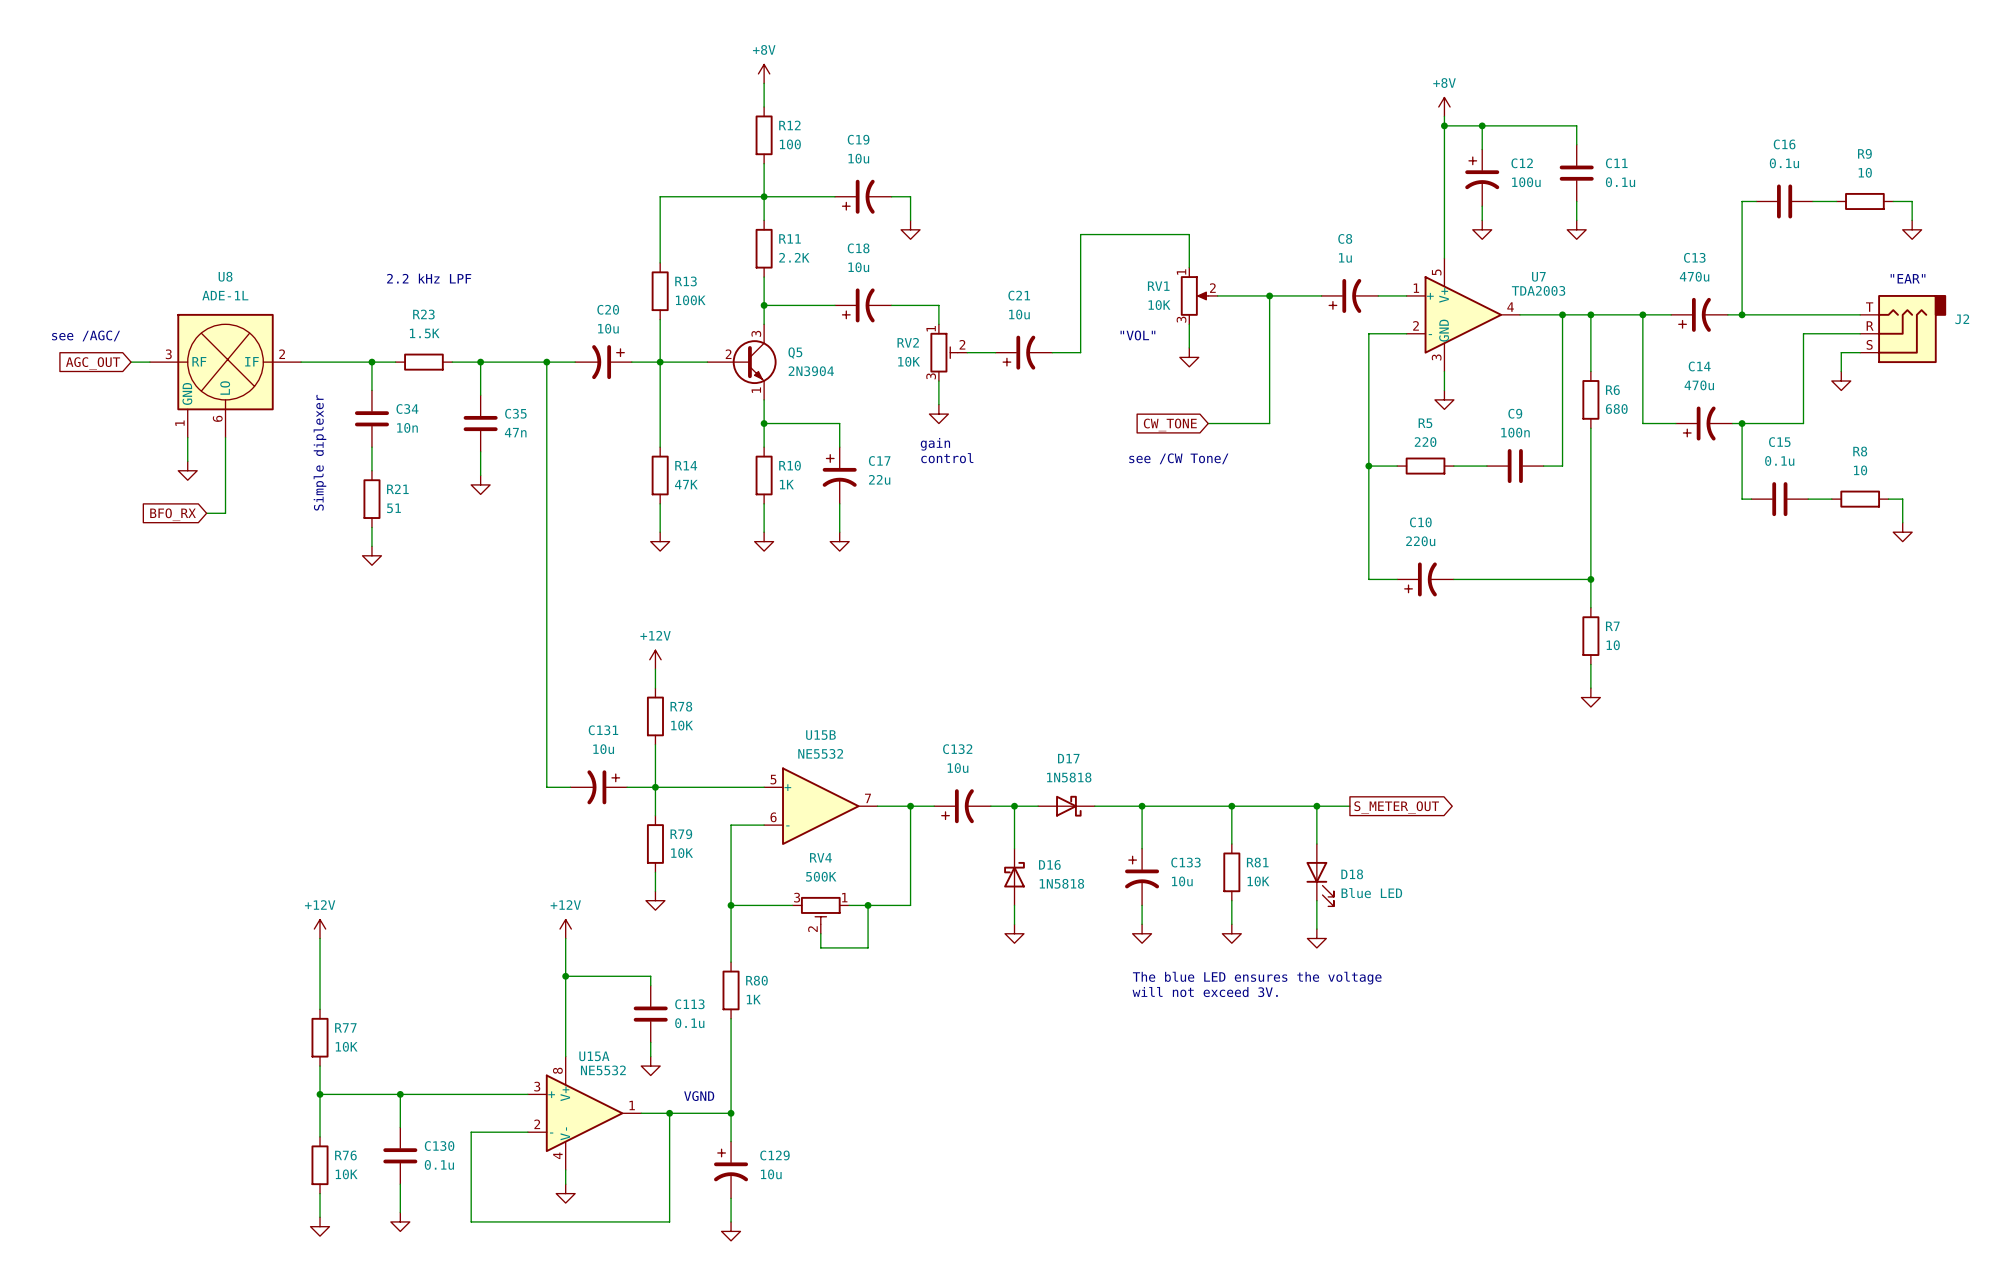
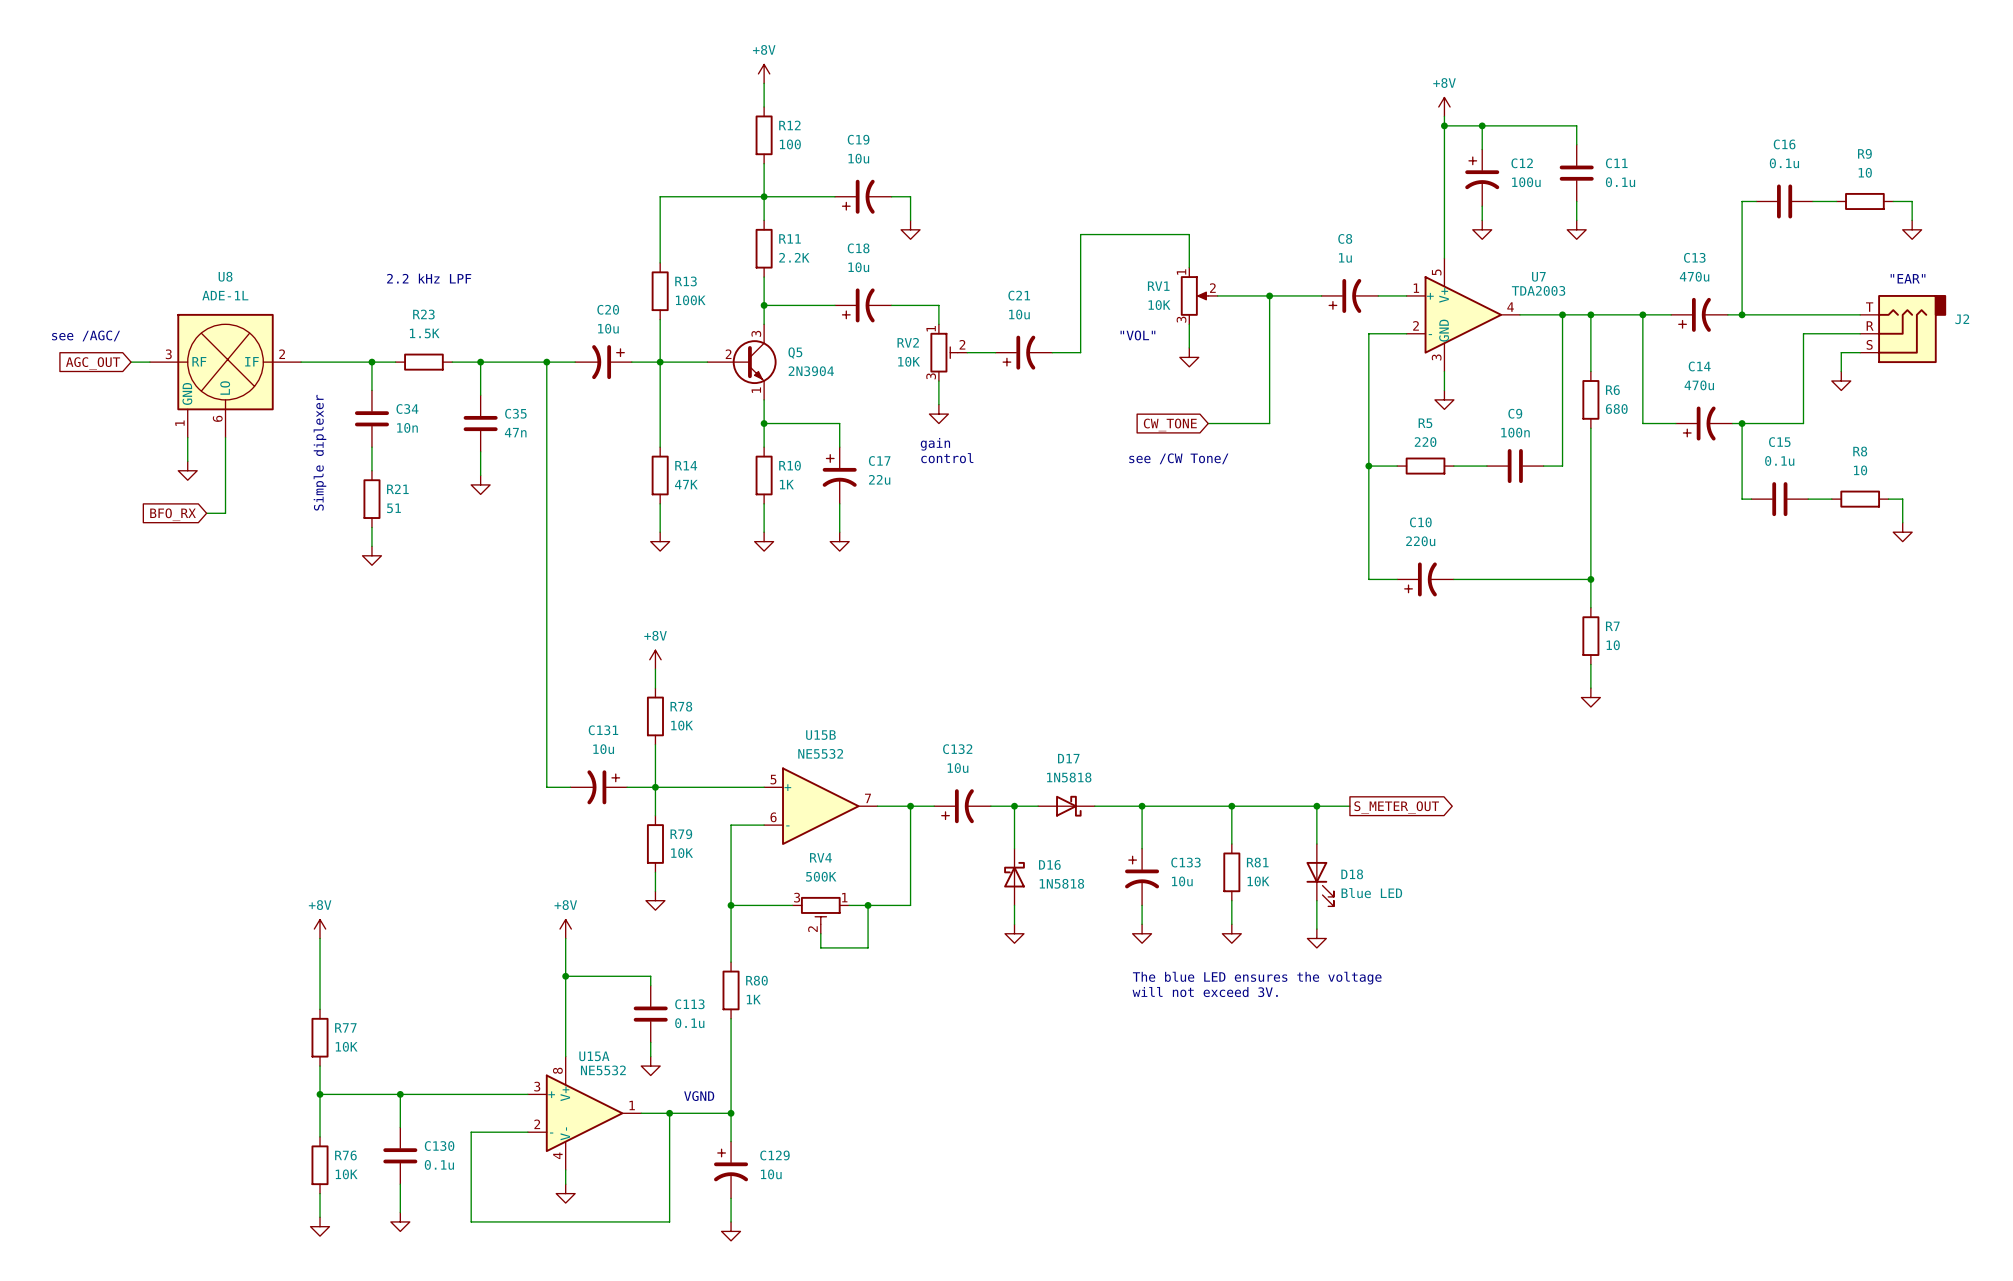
power symbol: +12V (655, 659) -> +8V (655, 659)
power symbol: +12V (320, 929) -> +8V (320, 929)
power symbol: +12V (565, 929) -> +8V (565, 929)

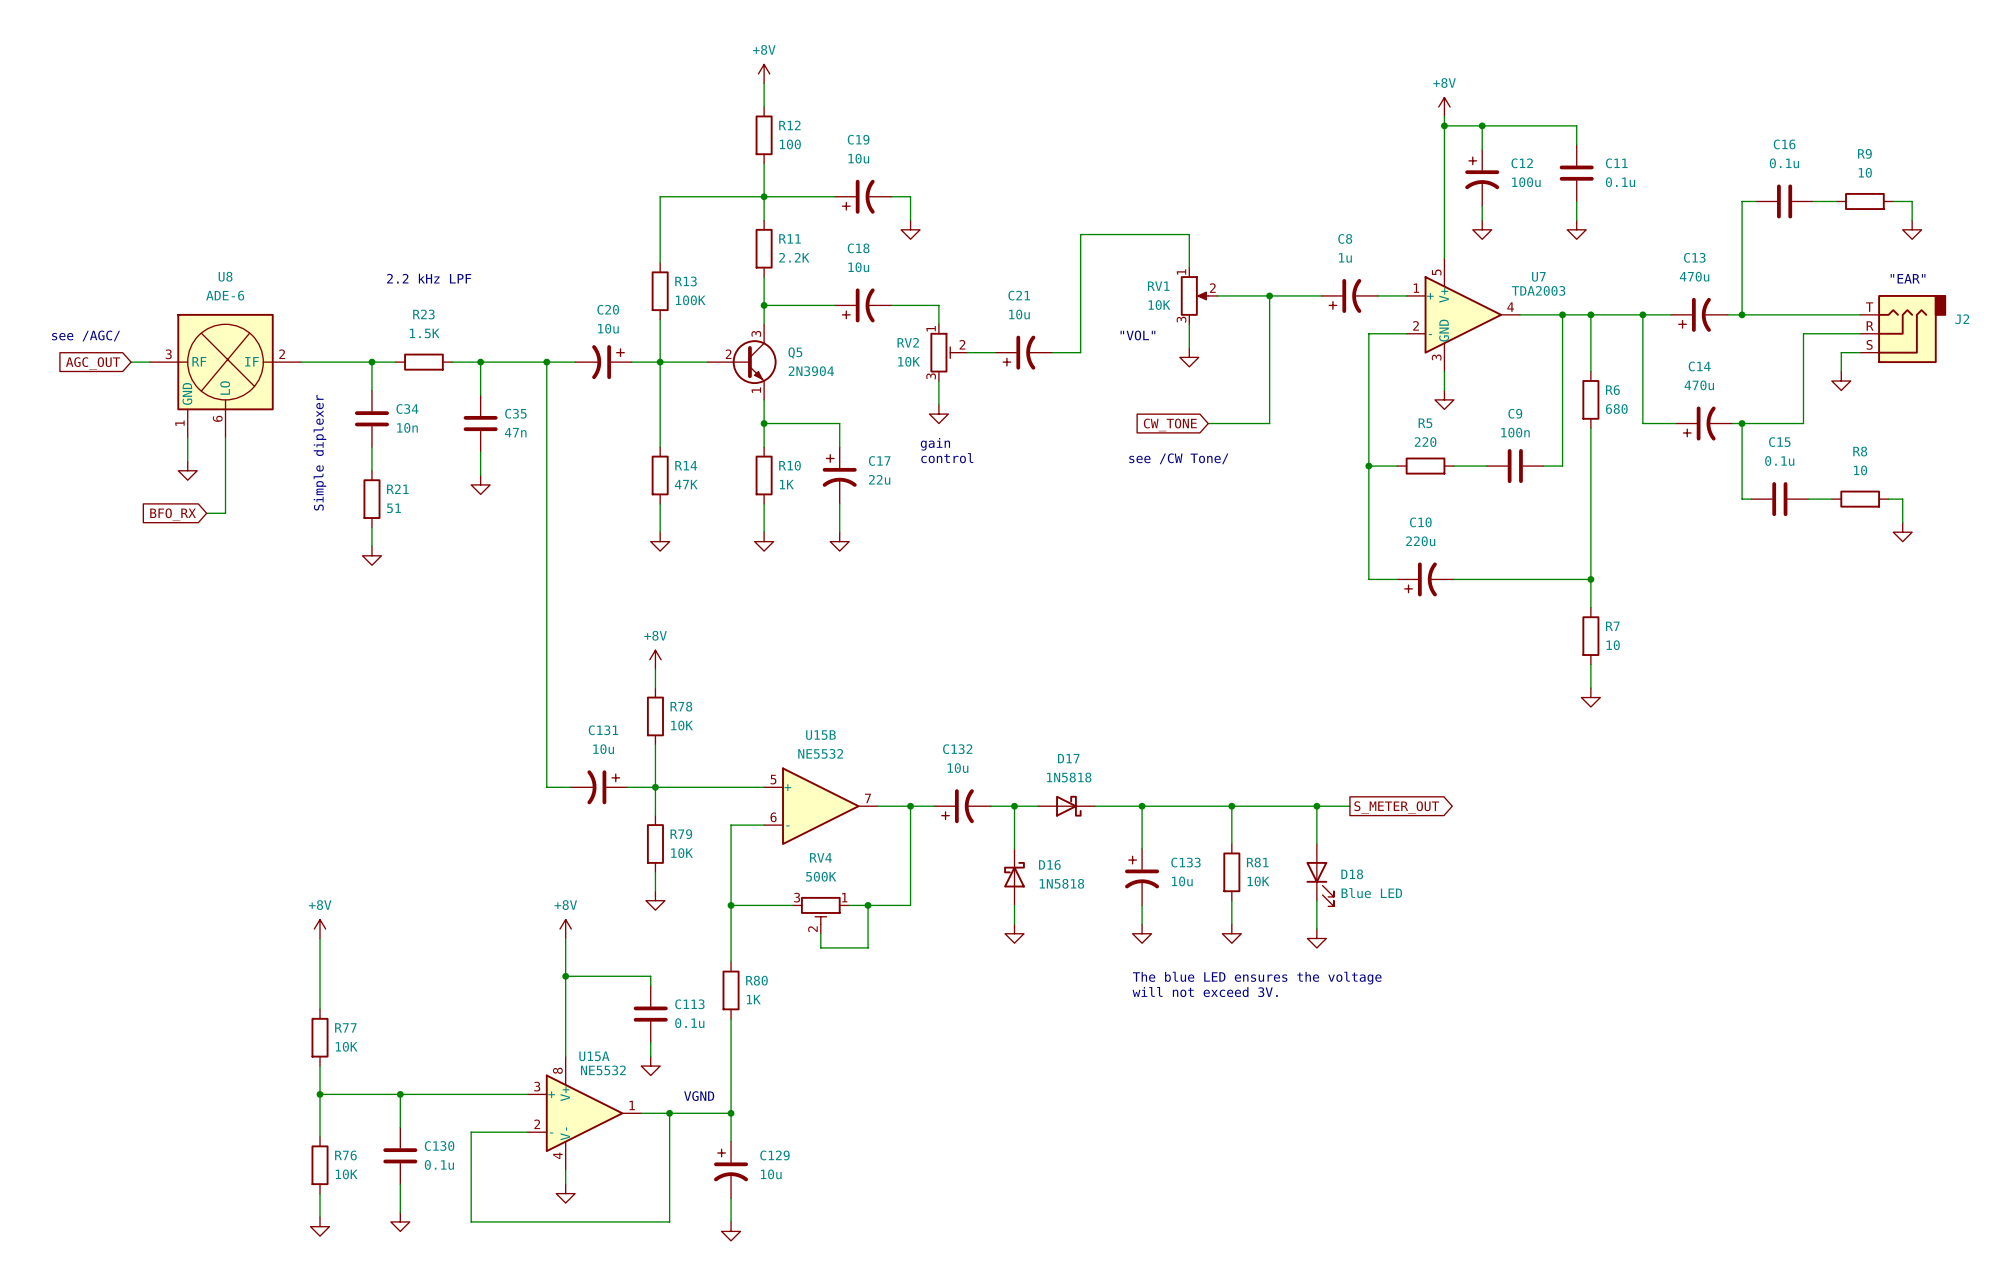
U8 value: ADE-1L (225, 295) -> ADE-6 (225, 295)

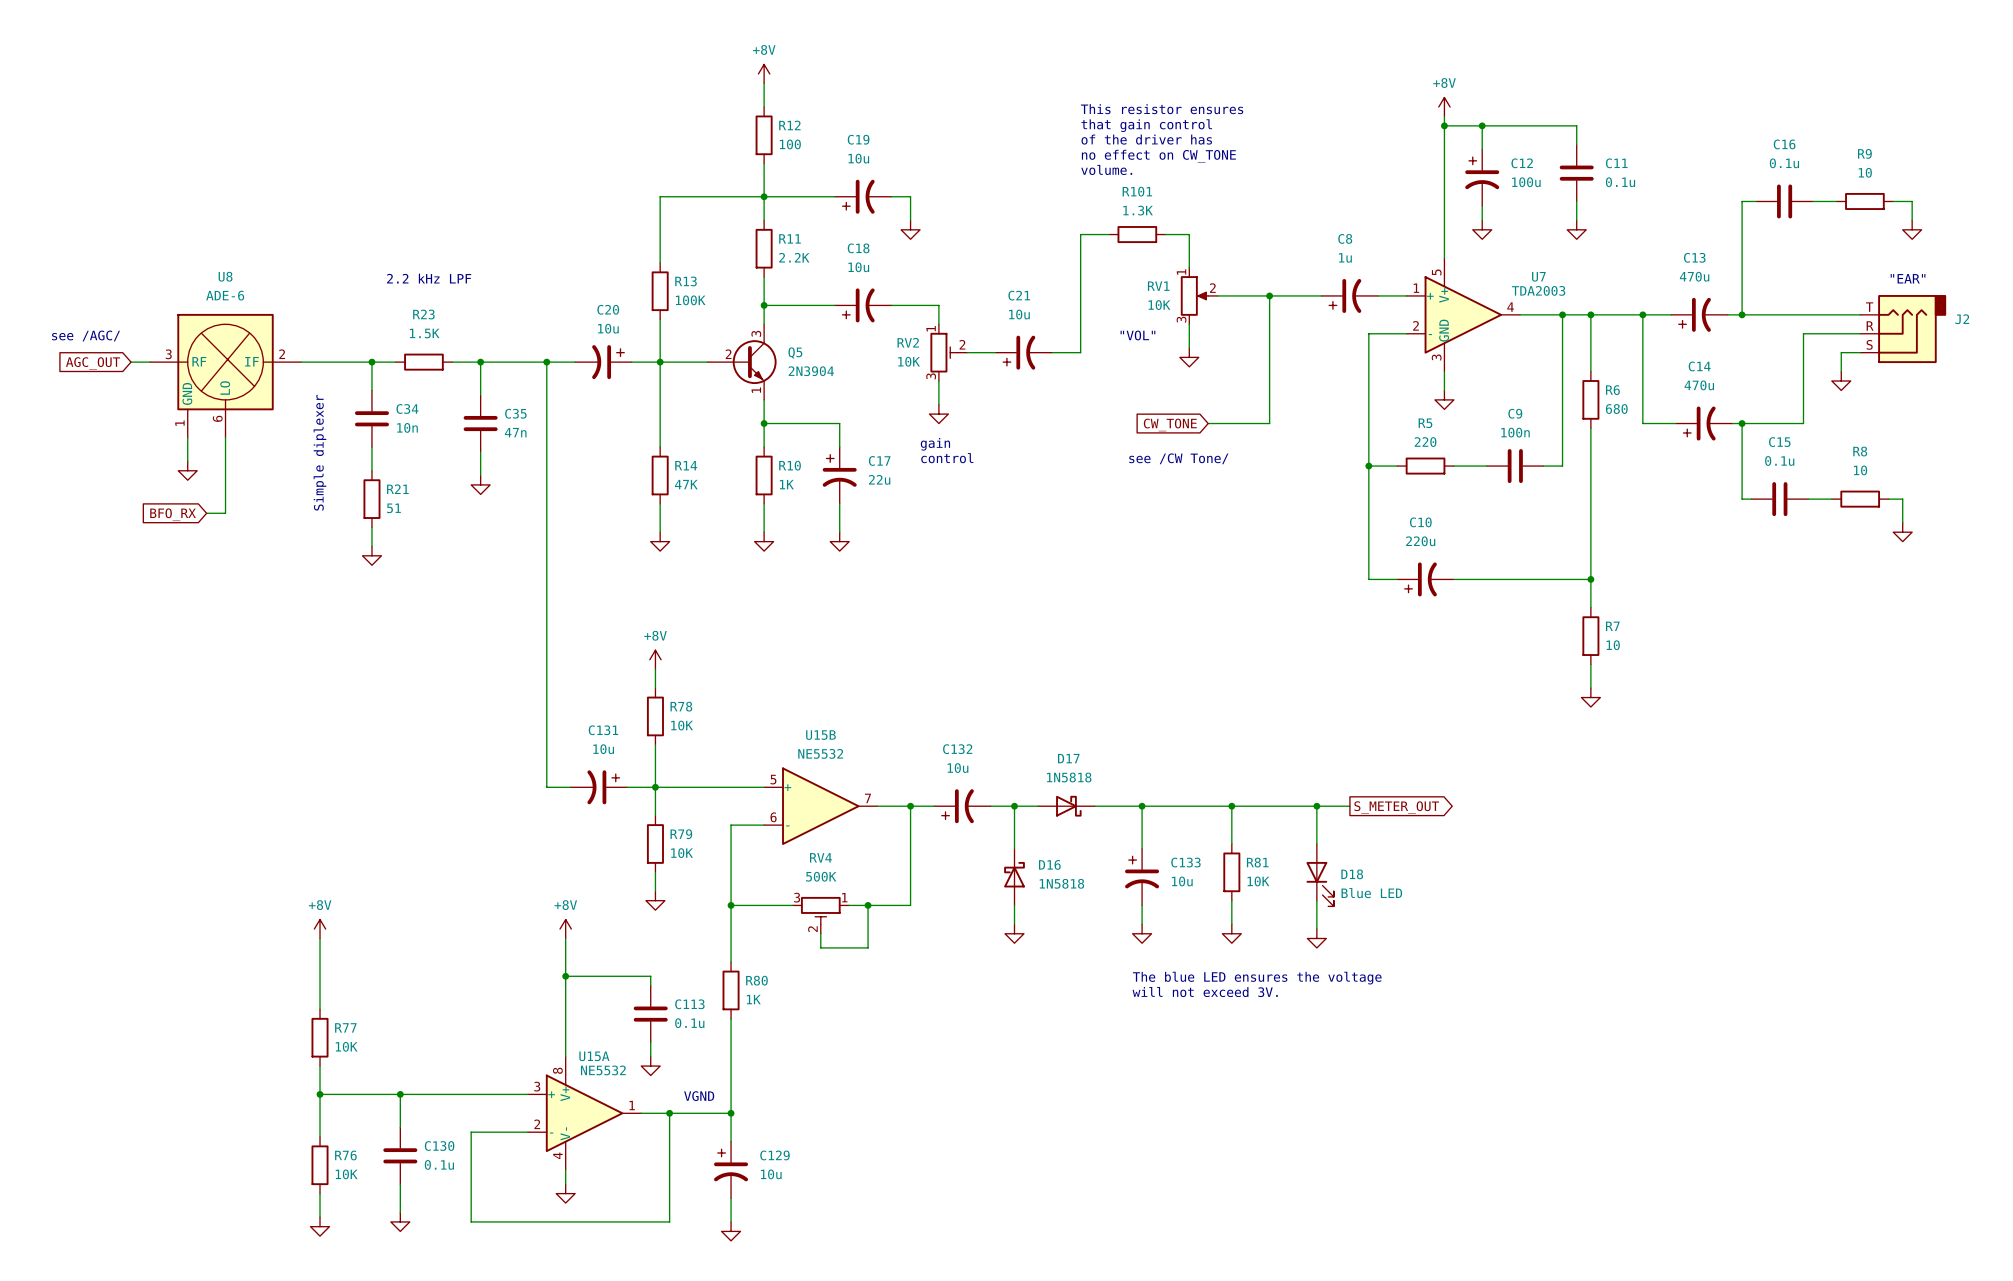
text: none -> This resistor ensures (1162, 109)
text: none -> that gain control (1146, 125)
text: none -> of the driver has (1146, 139)
text: none -> no effect on CW_TONE (1158, 156)
text: none -> volume. (1106, 169)
wire: (1108, 234) (1165, 234) -> none
R101: none -> 1.3K (1137, 234)

